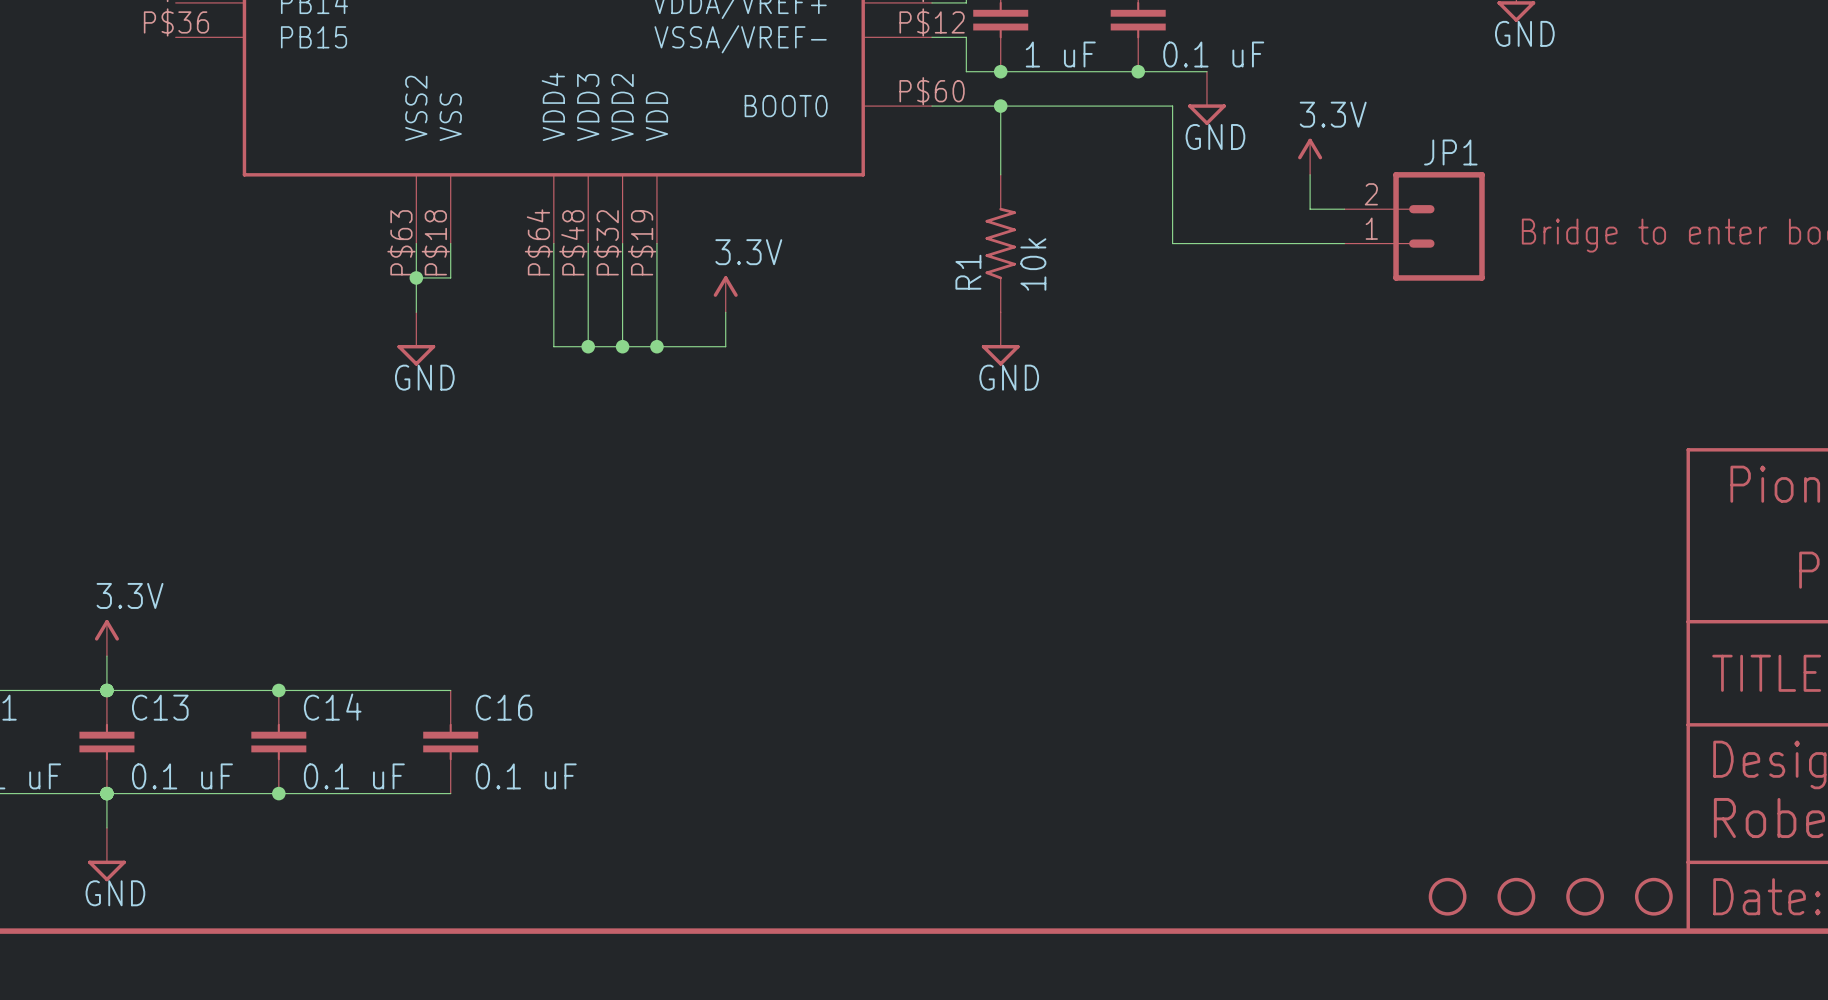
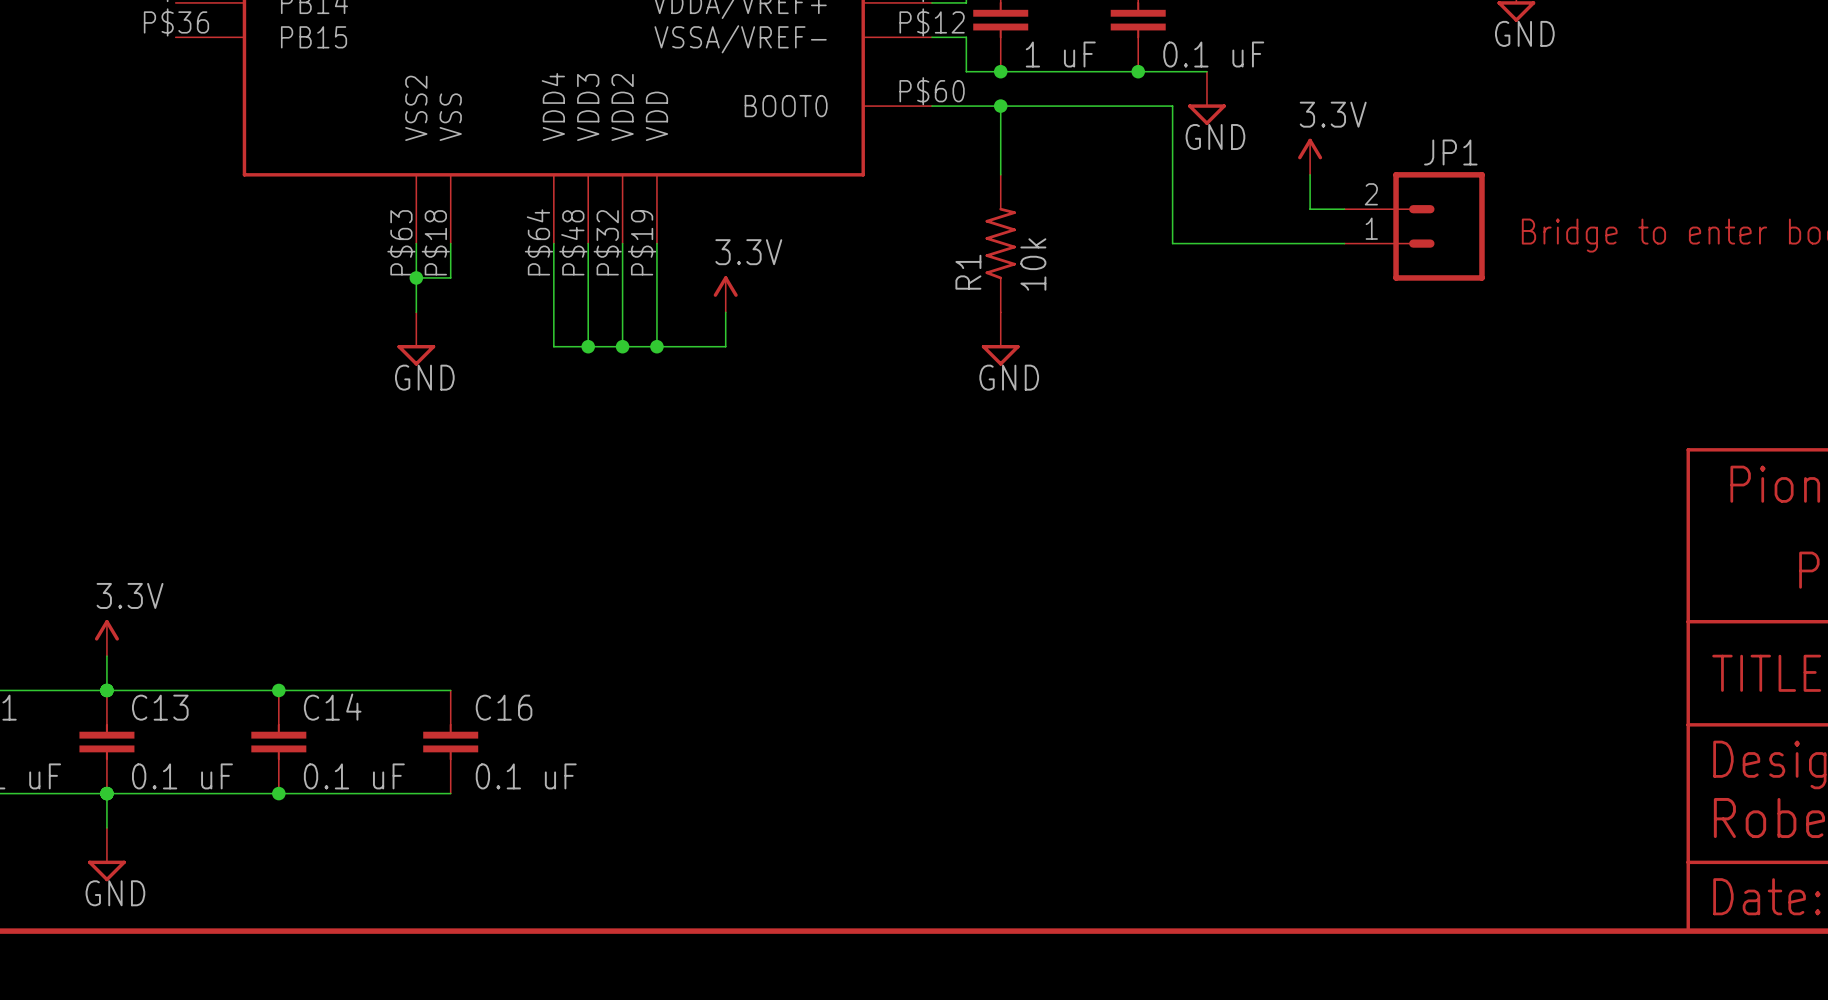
part: (1447, 896) -> none
part: (1516, 896) -> none
part: (1585, 896) -> none
part: (1653, 896) -> none

